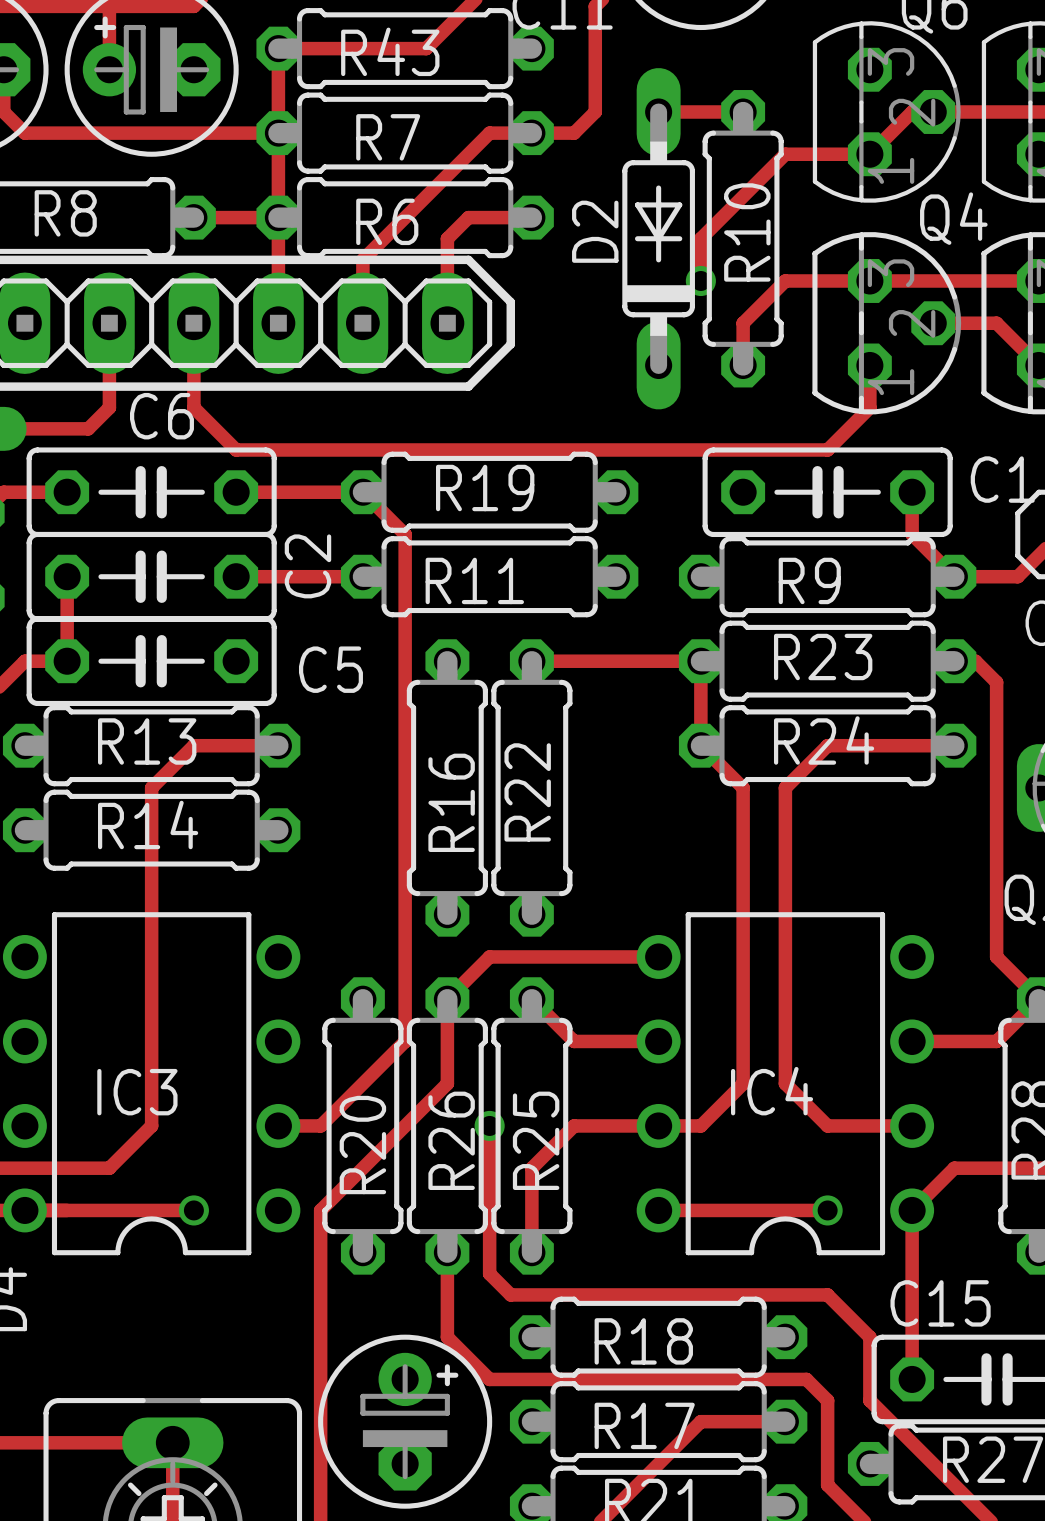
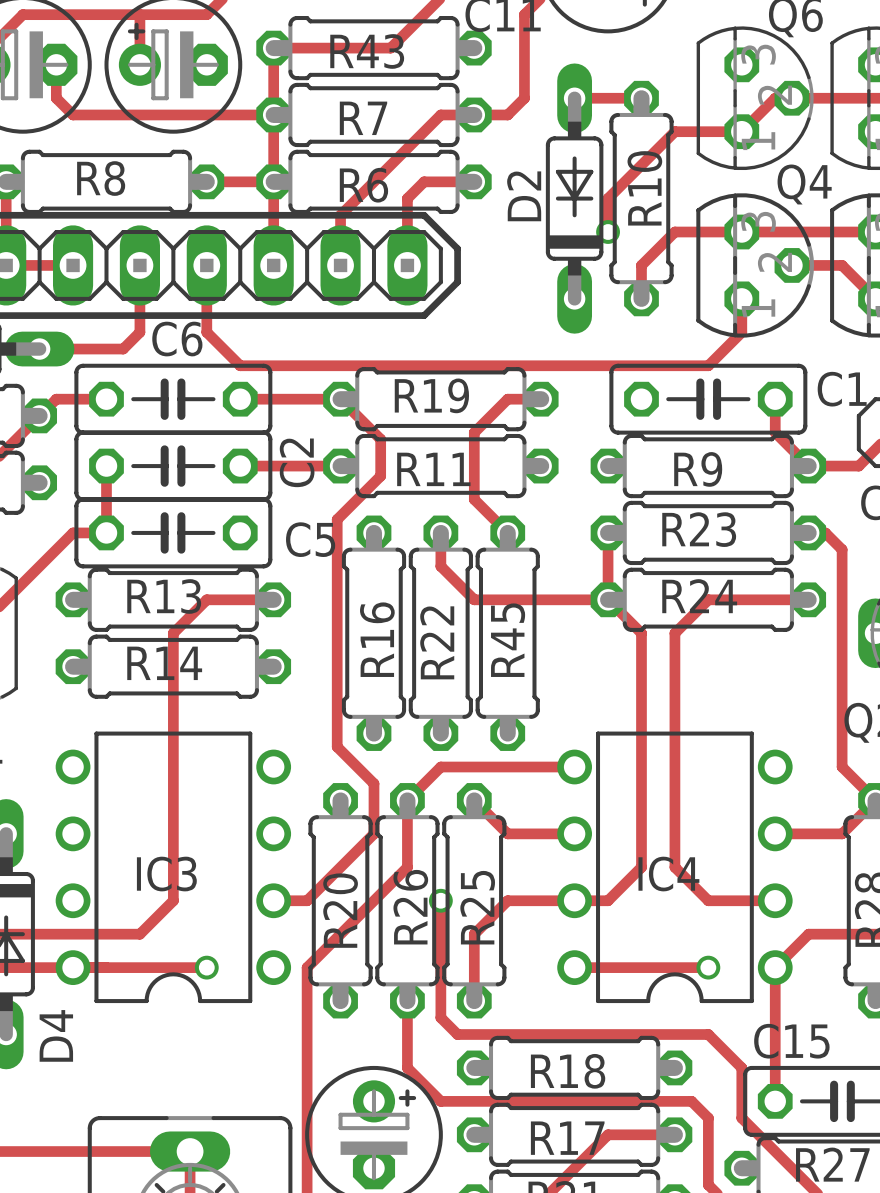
track: none -> (541, 399) (507, 399) (474, 432) (474, 499) (507, 532)
track: (405, 534) (405, 978) -> (373, 432) (380, 439) (380, 476) (337, 519) (337, 746) (373, 783)
track: none -> (440, 532) (440, 566) (474, 599) (608, 599)
track: (531, 661) (700, 661) -> none
R16 position: (447, 787) -> (373, 633)
R22 position: (531, 787) -> (440, 633)
R45: none -> (507, 633)

